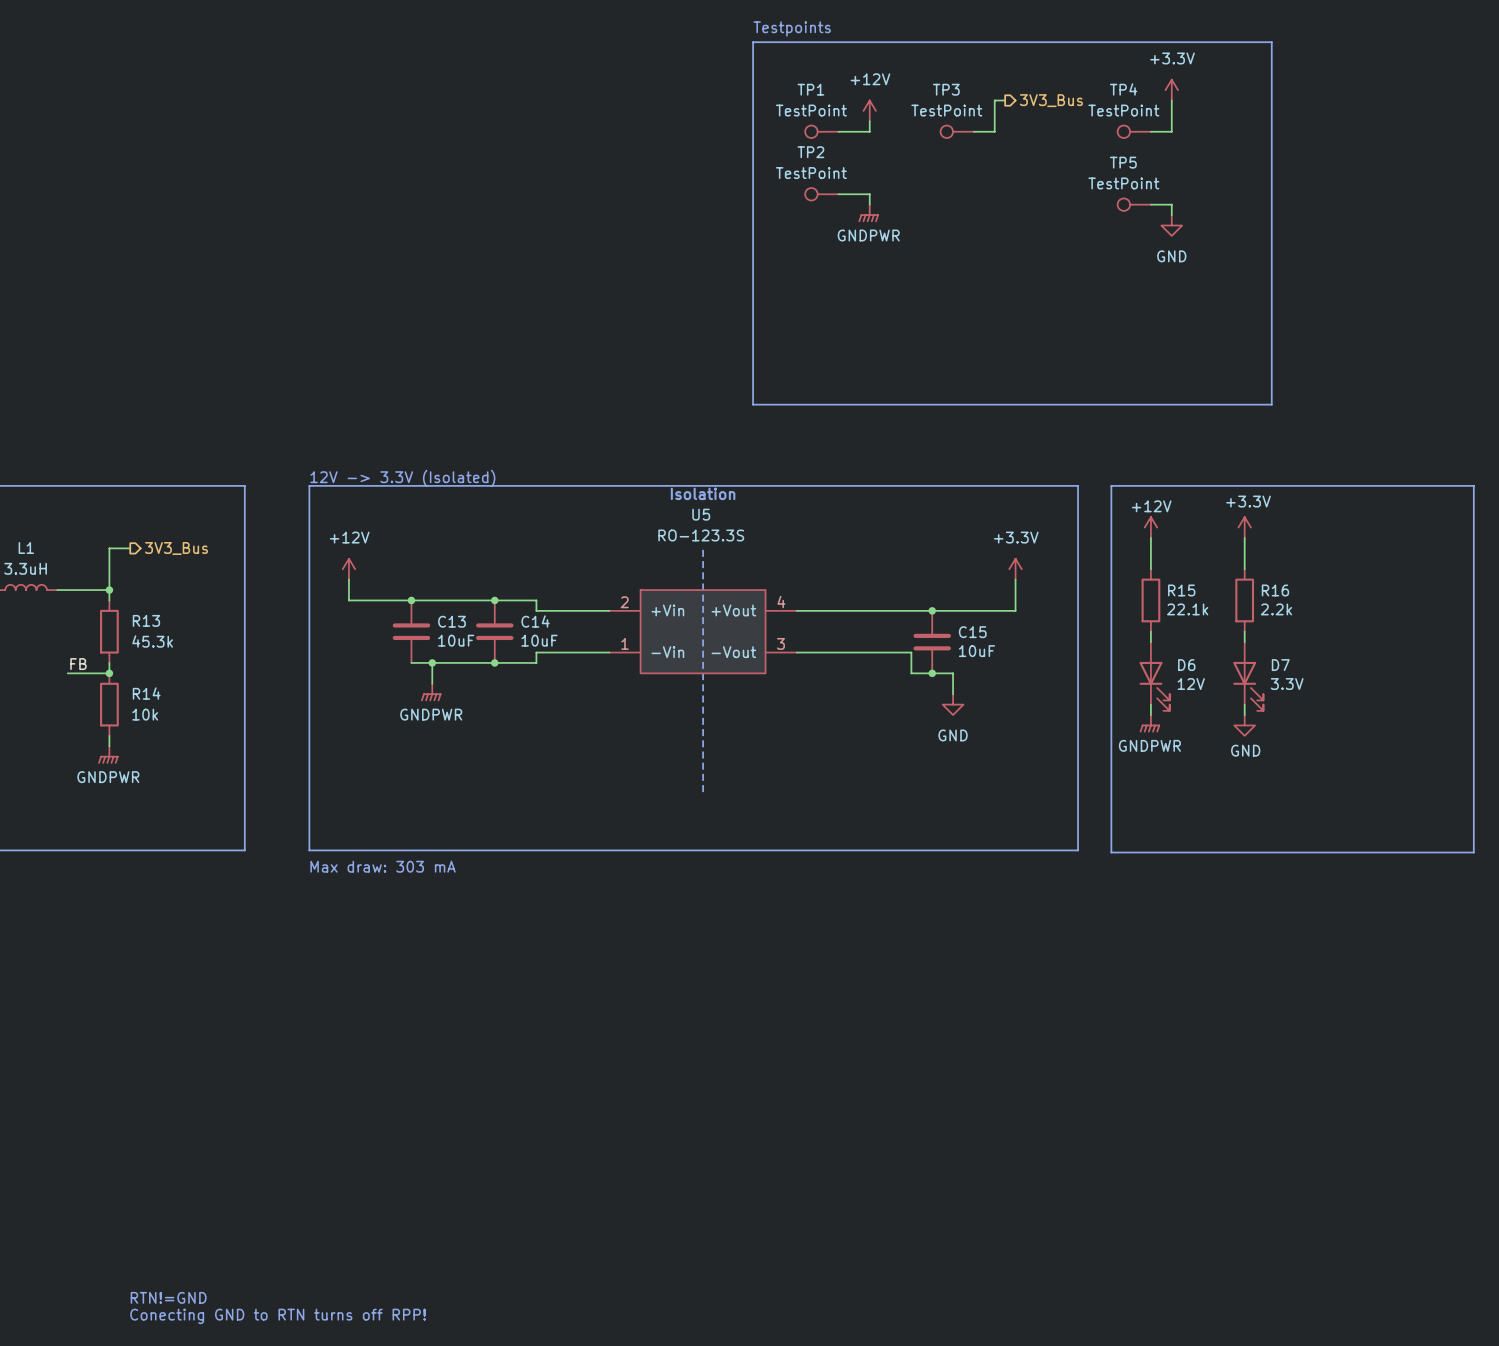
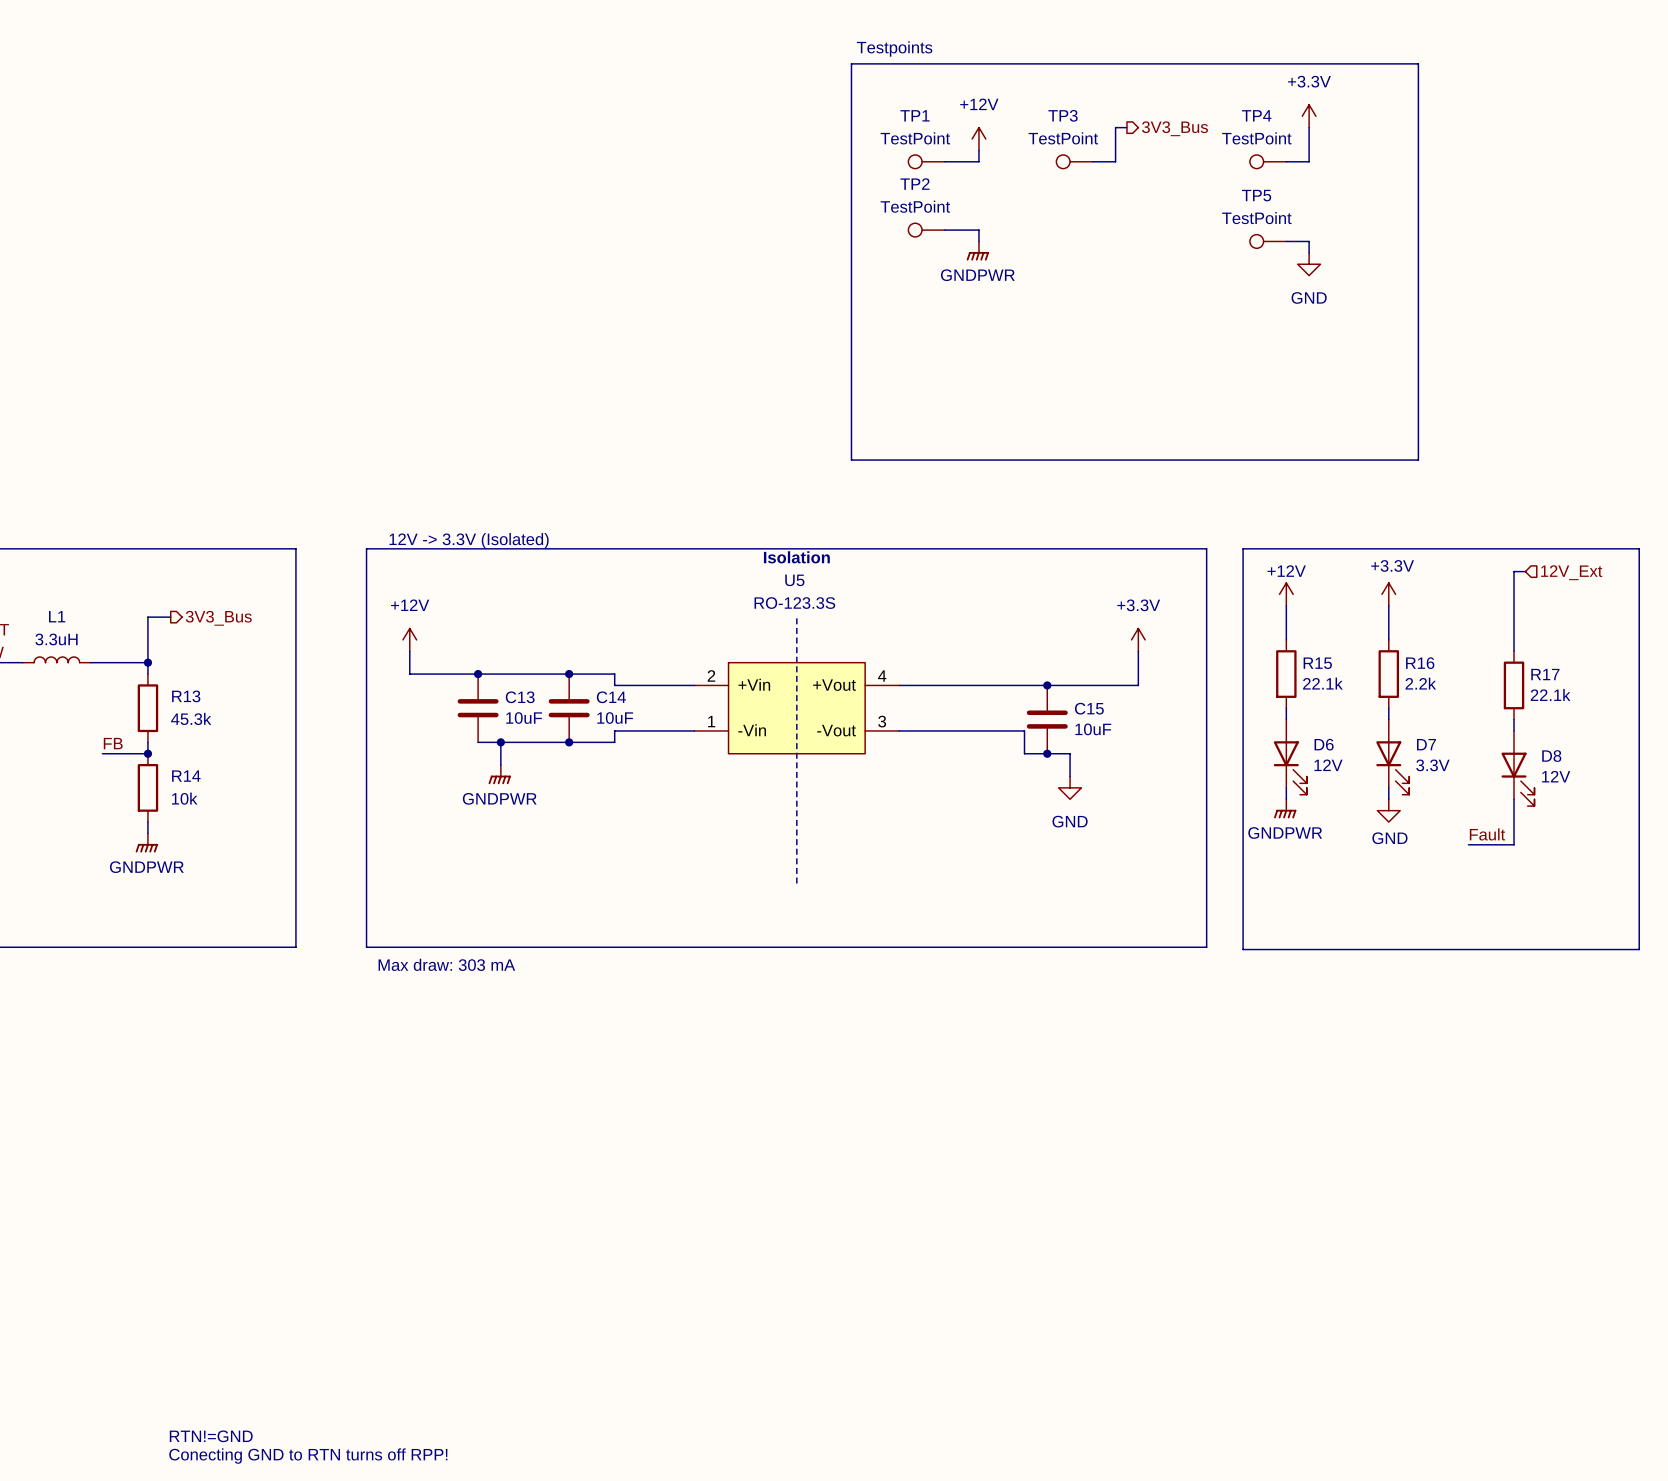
wire: none -> (1525, 571) (1514, 571) (1514, 651)
hierarchical label: none -> 12V_Ext (1571, 572)
R17: none -> 22.1k (1514, 685)
wire: none -> (1514, 719) (1514, 730)
D8: none -> 12V (1517, 768)
wire: none -> (1514, 799) (1514, 844) (1468, 844)
label: none -> Fault (1487, 834)

